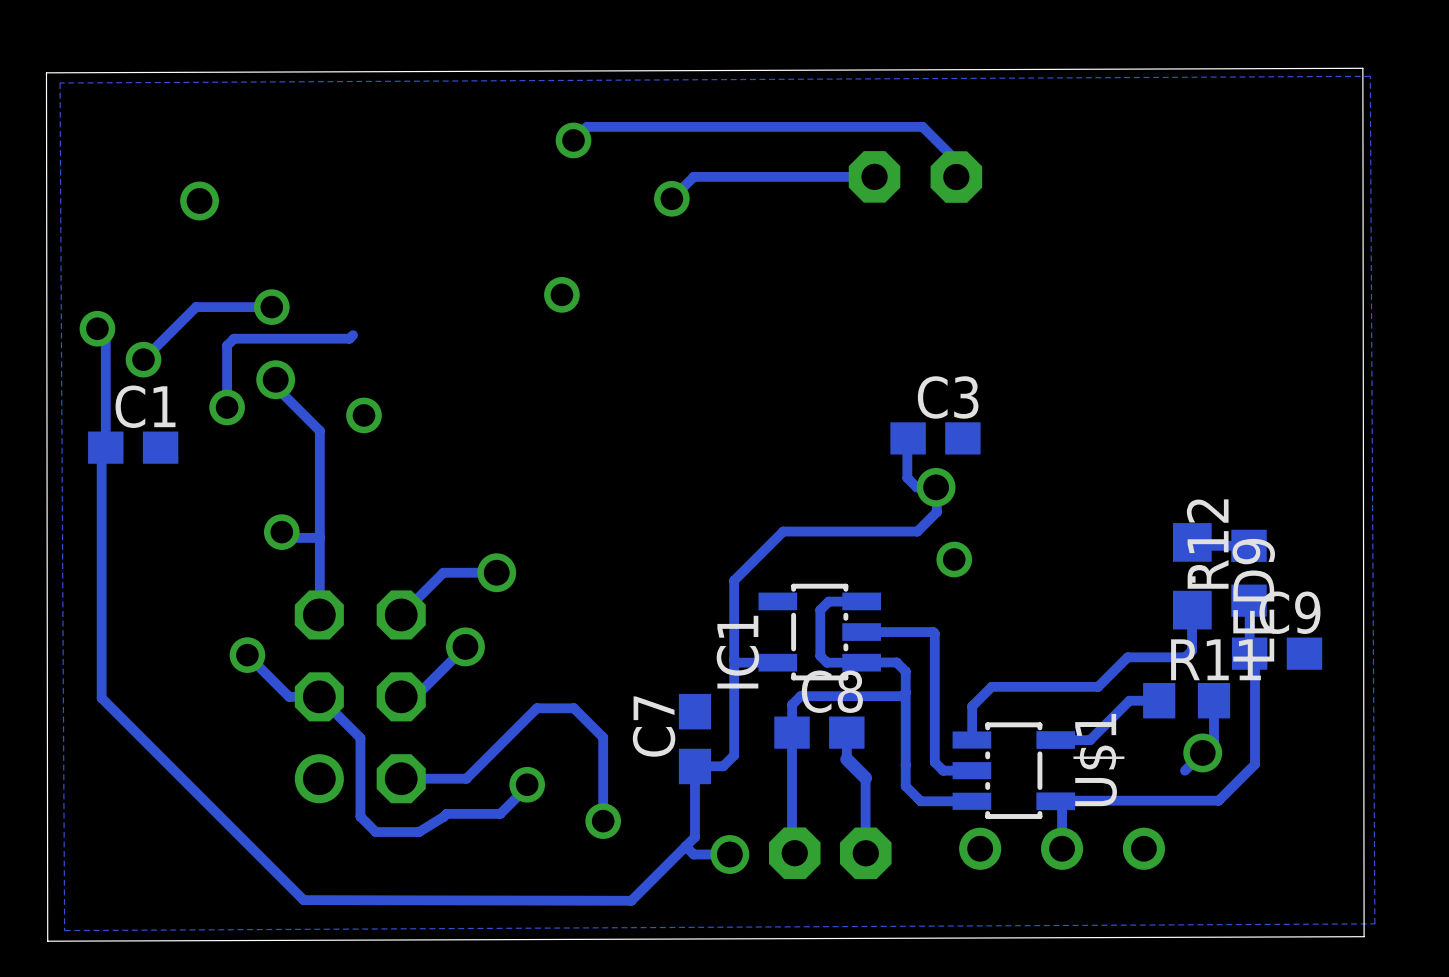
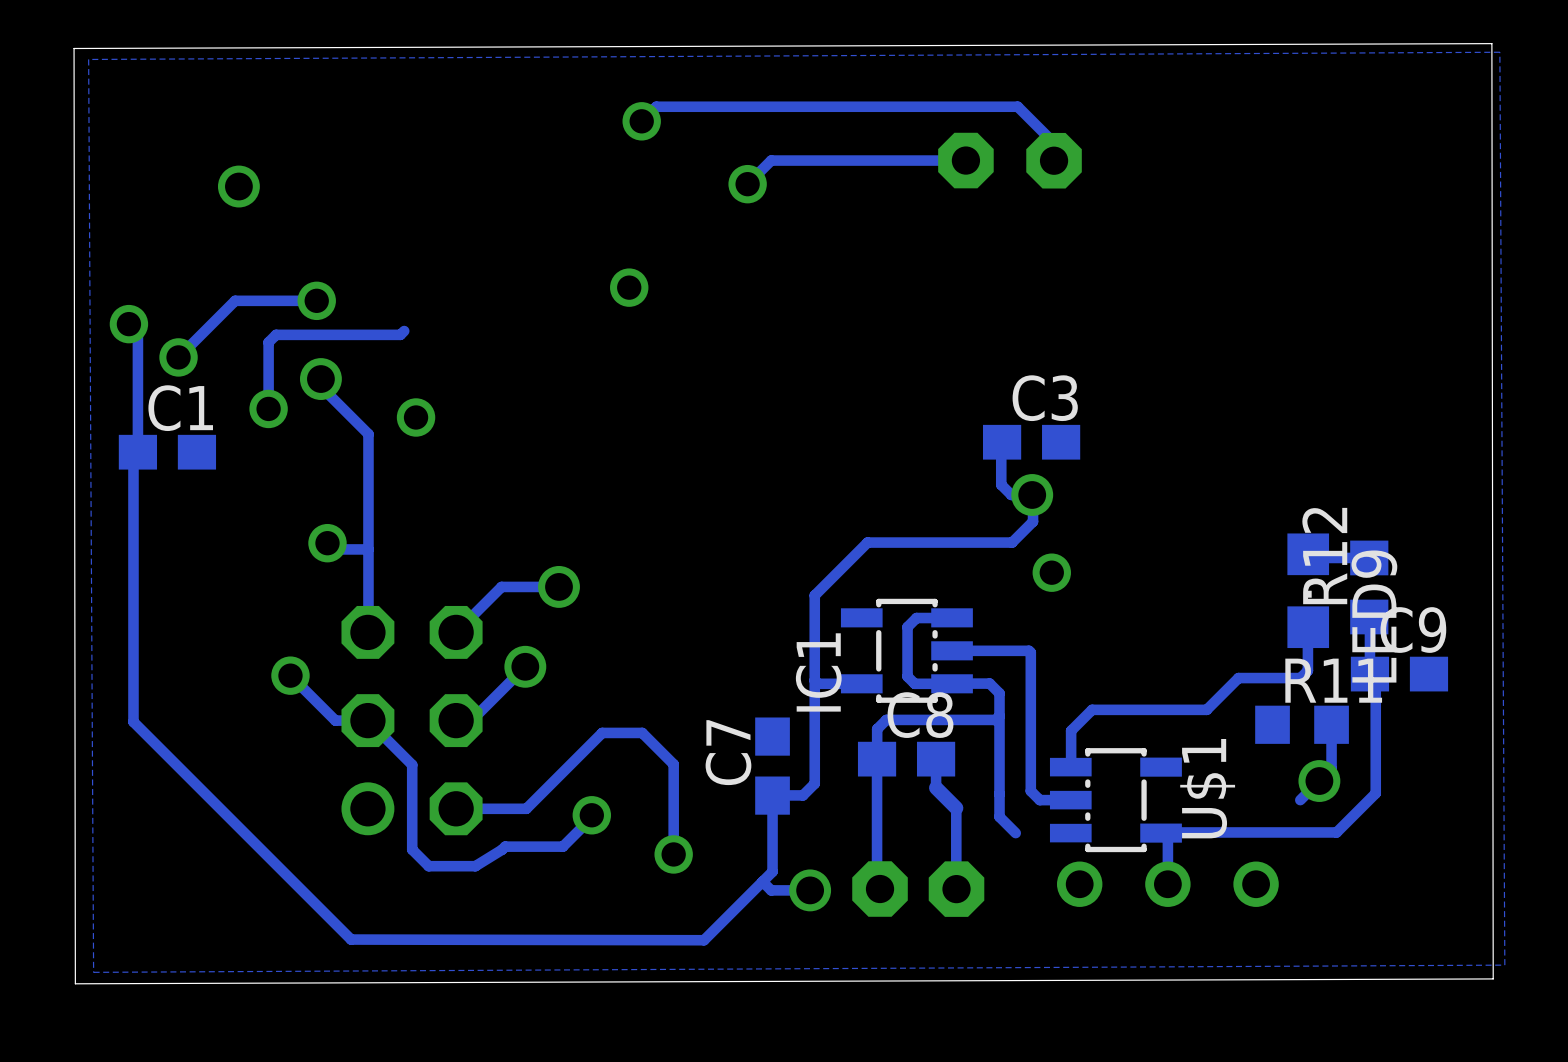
track: (1159, 700) (1129, 700) (1090, 740) (1055, 740) -> none
track: (971, 801) (920, 801) -> none

